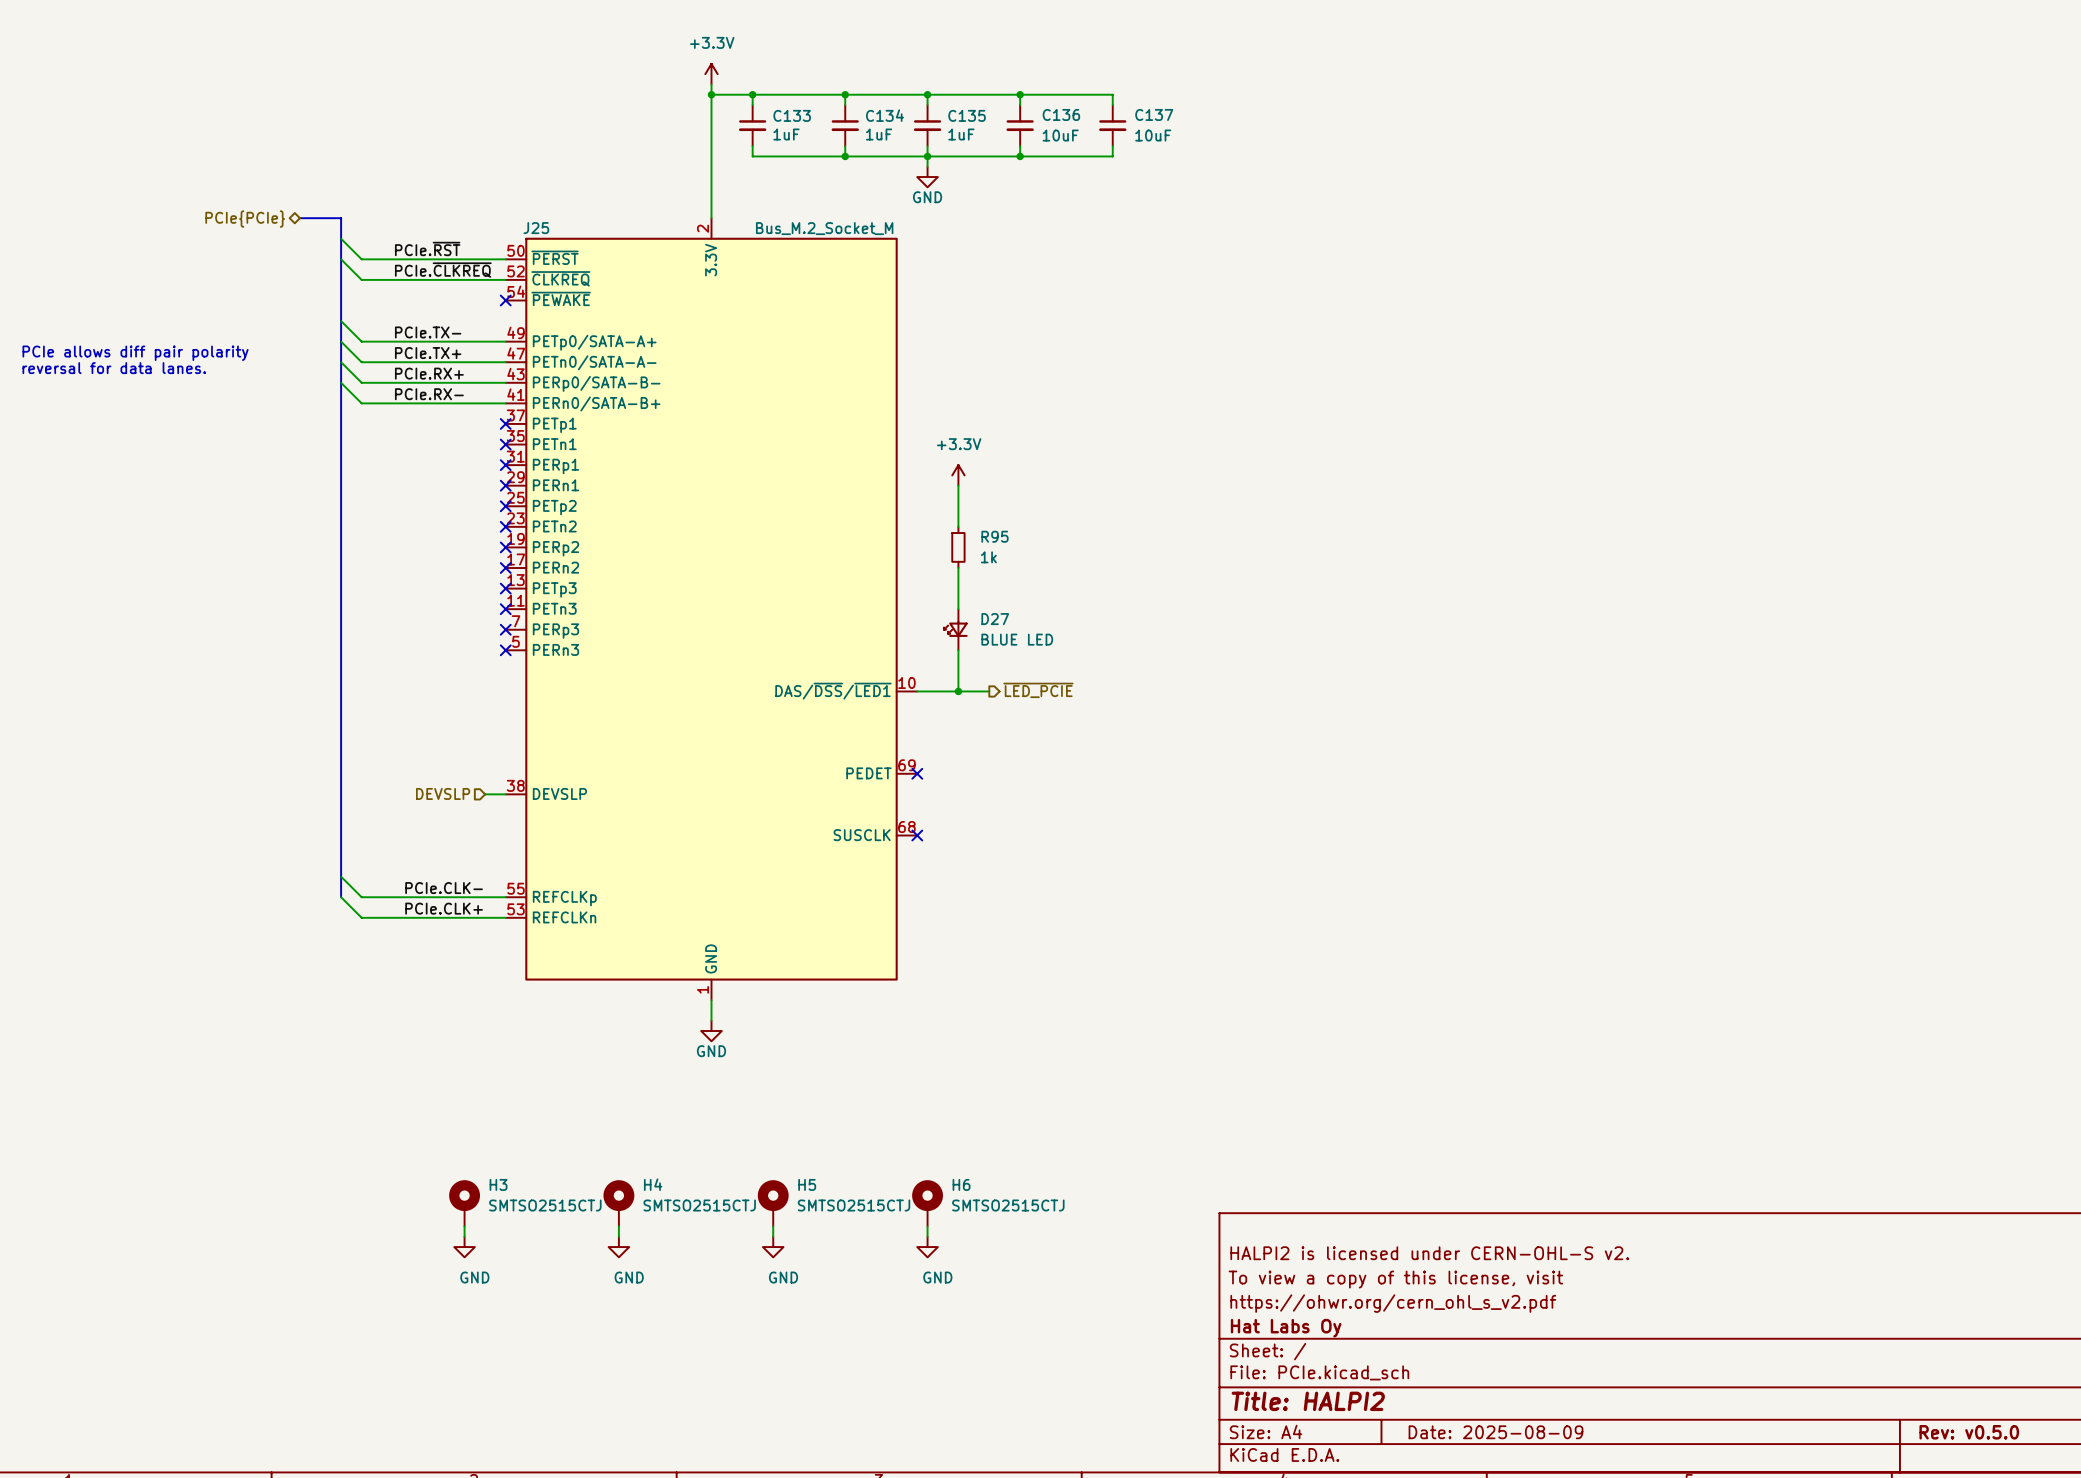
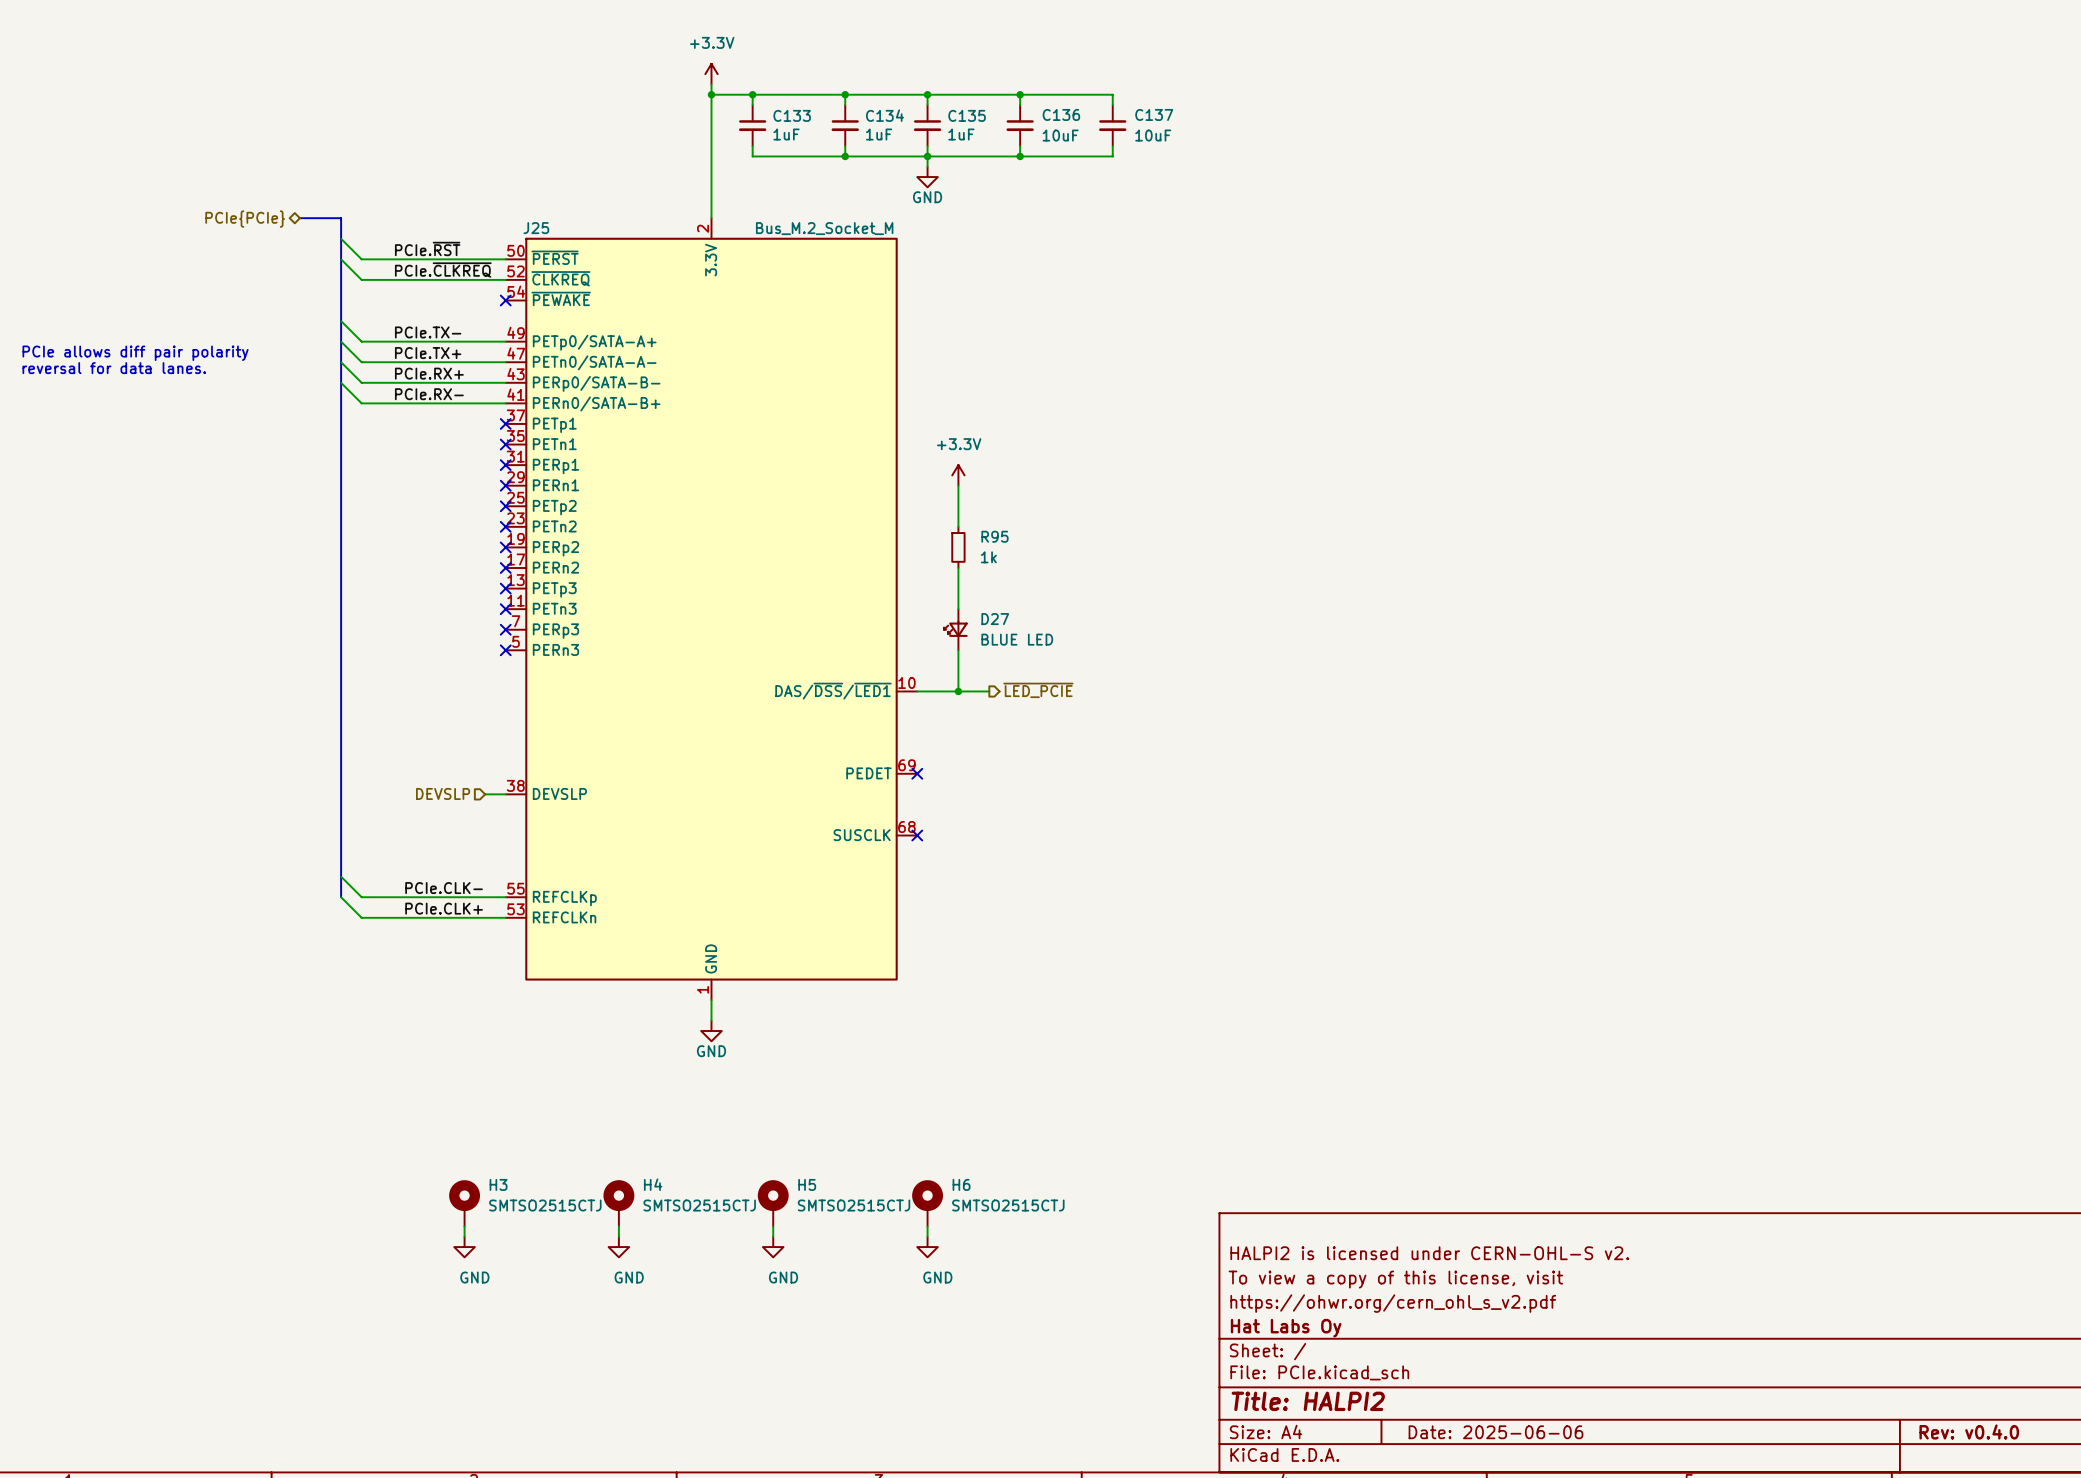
title block: Date: 2025-08-09 (1495, 1432) -> Date: 2025-06-06 (1495, 1432)
title block: Rev: v0.5.0 (1969, 1432) -> Rev: v0.4.0 (1969, 1431)

